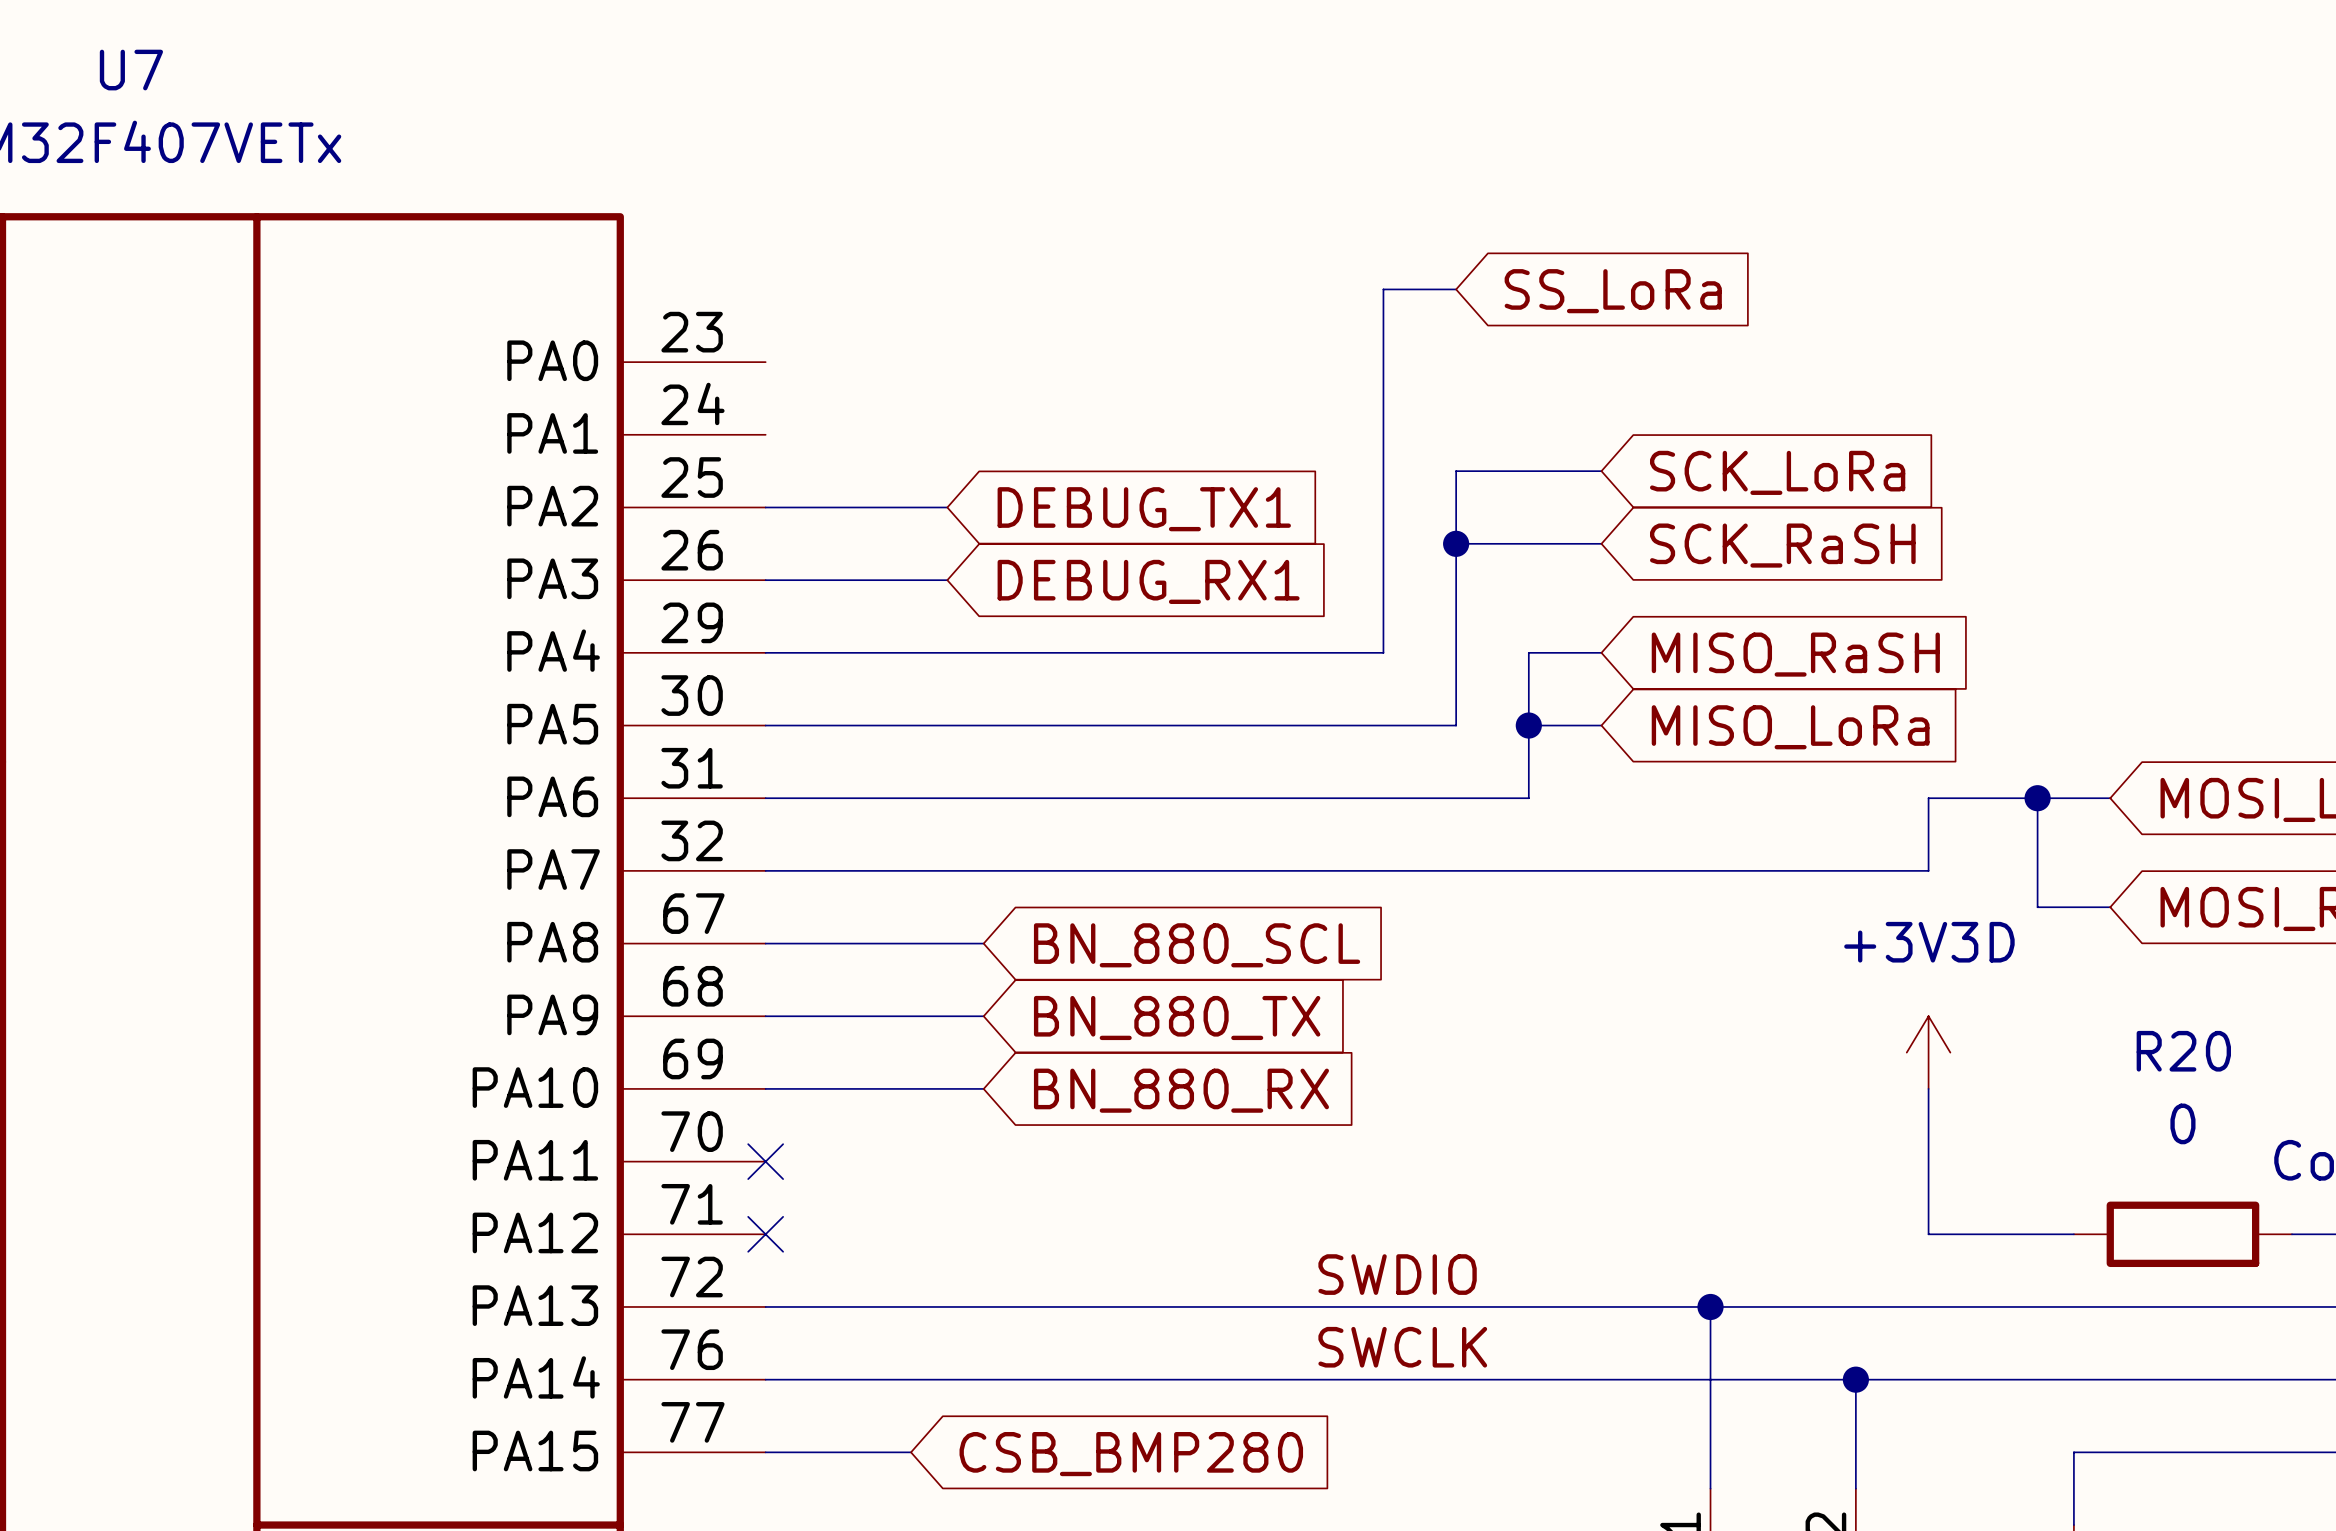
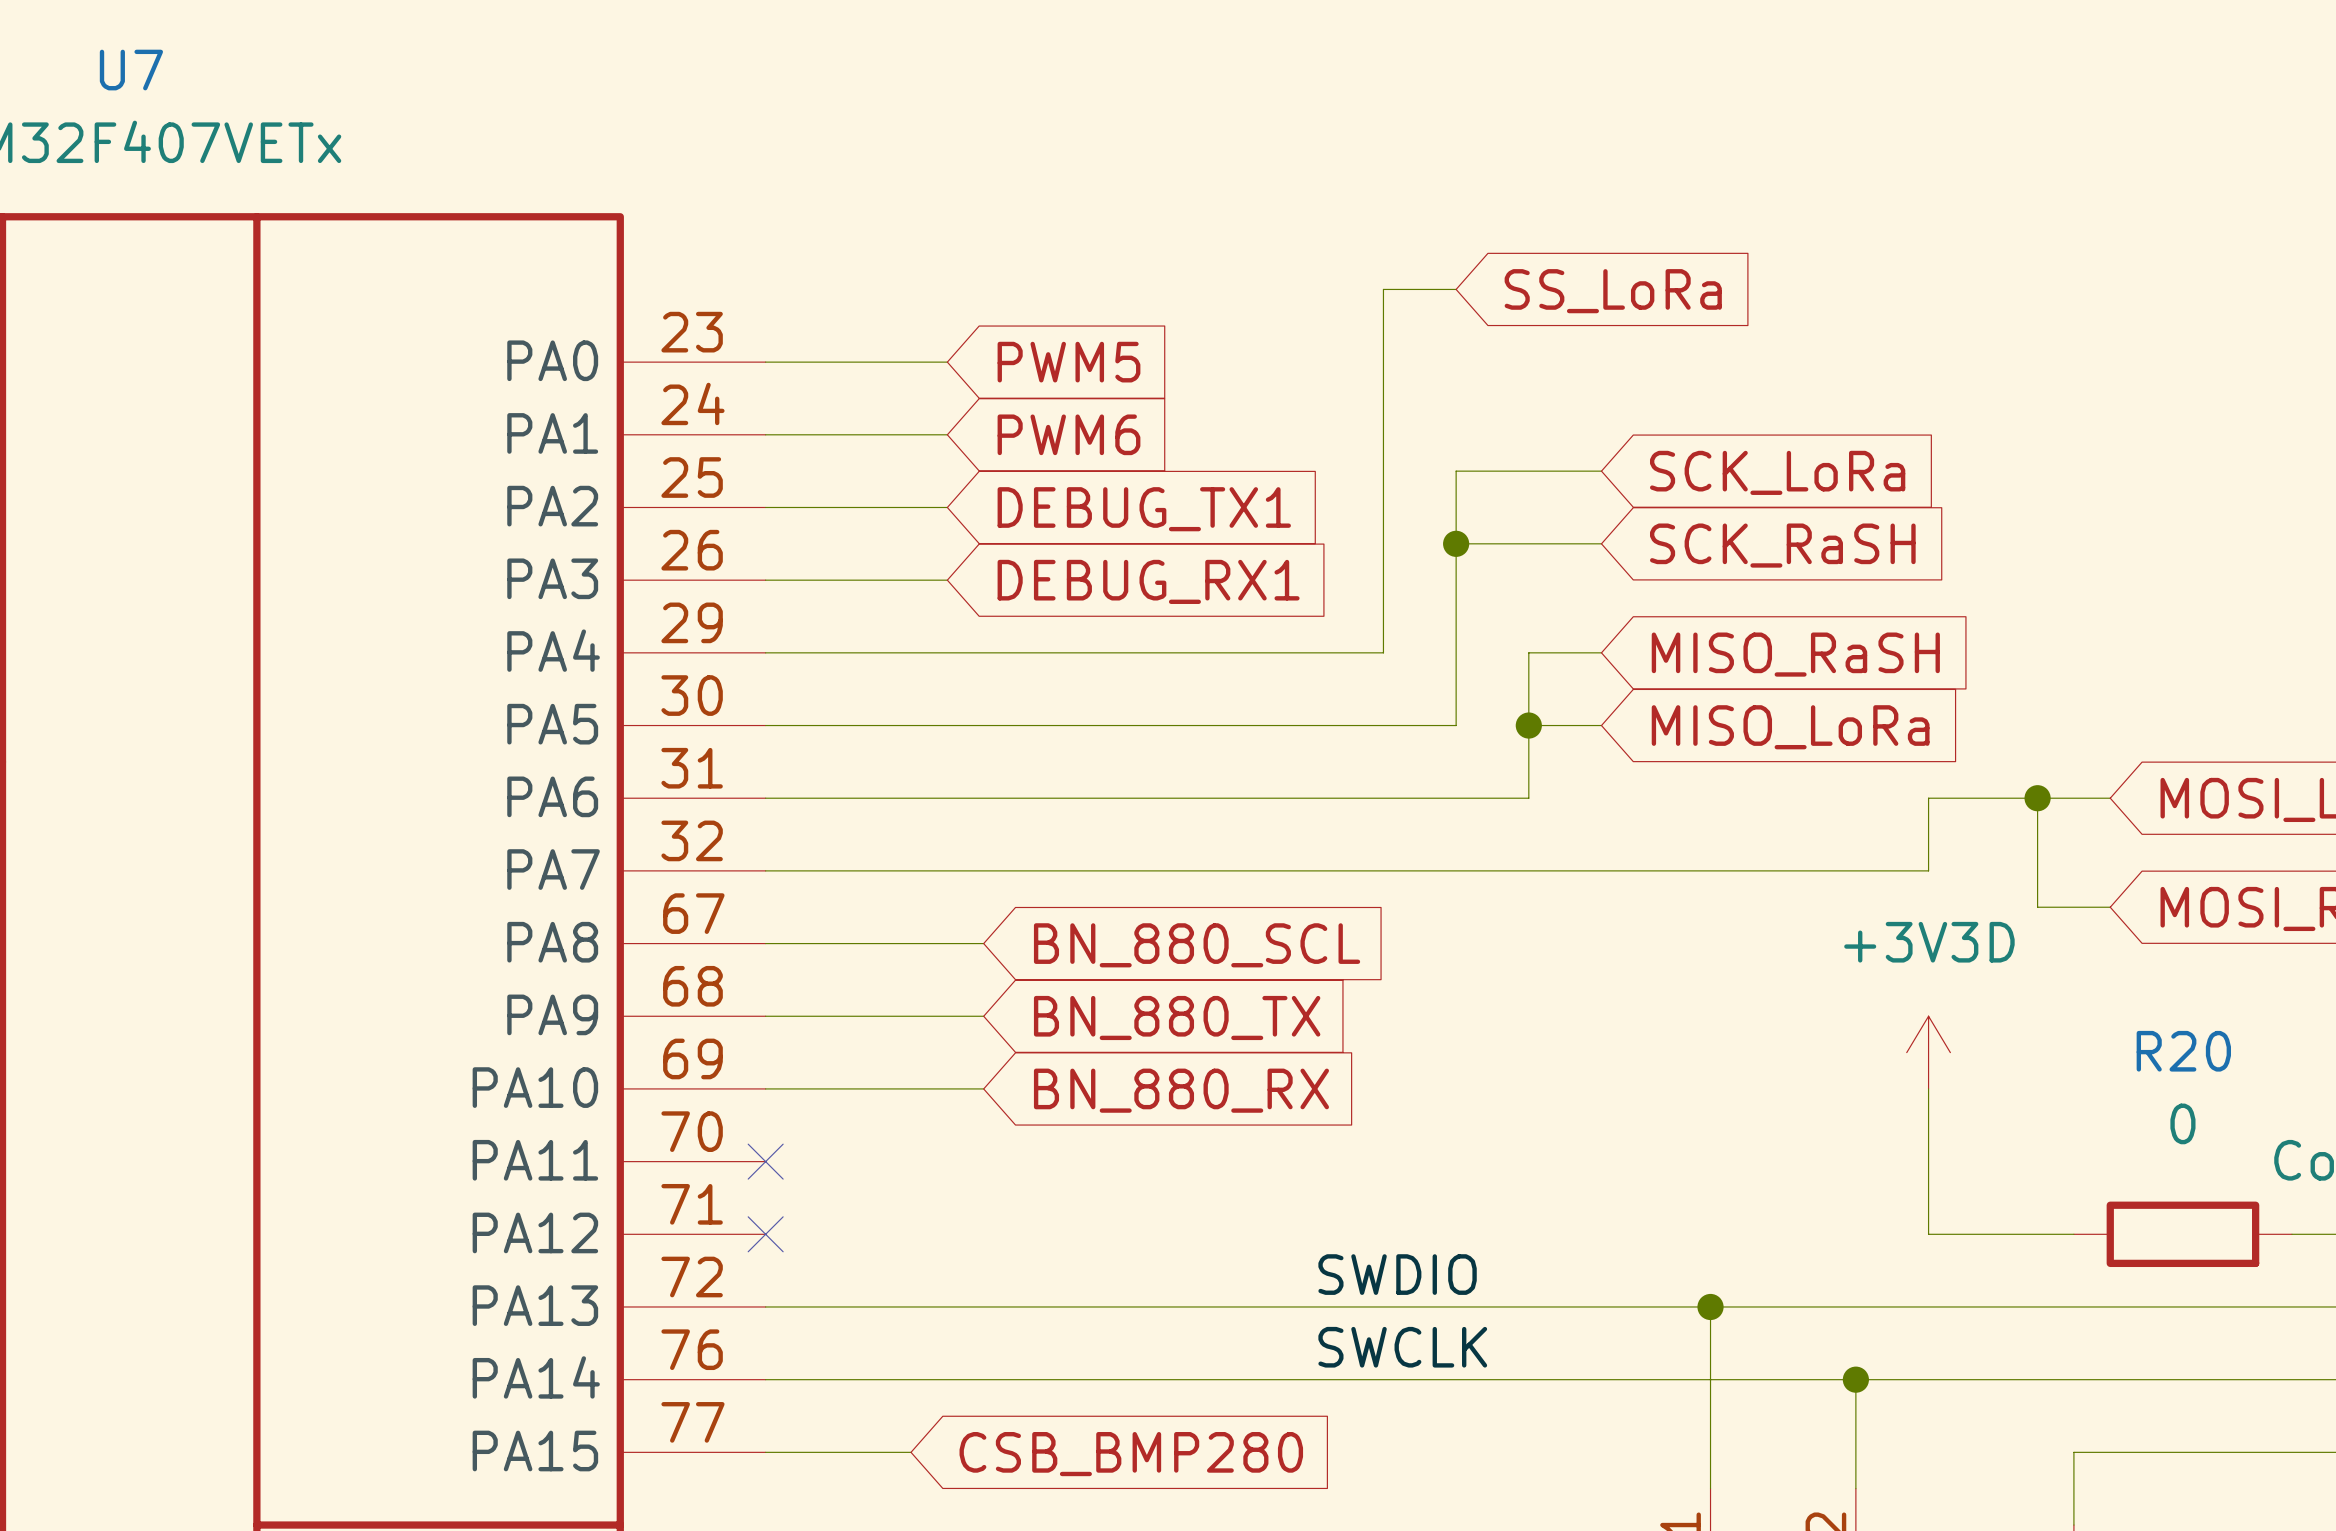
wire: none -> (765, 362) (947, 362)
global label: none -> PWM5 (1068, 362)
wire: none -> (765, 434) (947, 434)
global label: none -> PWM6 (1068, 434)

